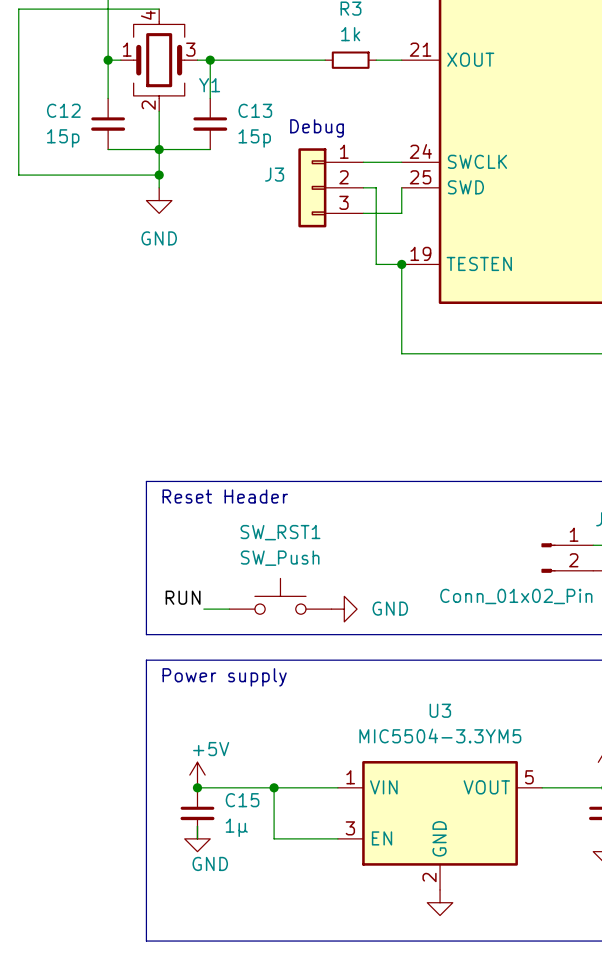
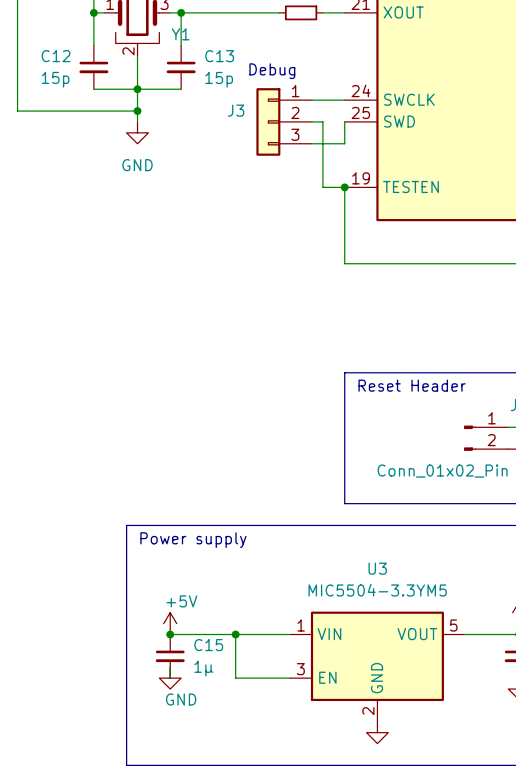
line: (401, 481) (146, 481) (146, 634) (401, 634) -> (344, 372) (344, 503)
text: Reset Header (225, 496) -> none
text: none -> Reset Header (412, 385)
SW_RST1: SW_Push (280, 596) -> none
label: RUN (183, 597) -> none
wire: (203, 609) (229, 609) -> none
power symbol: GND (344, 609) -> none

